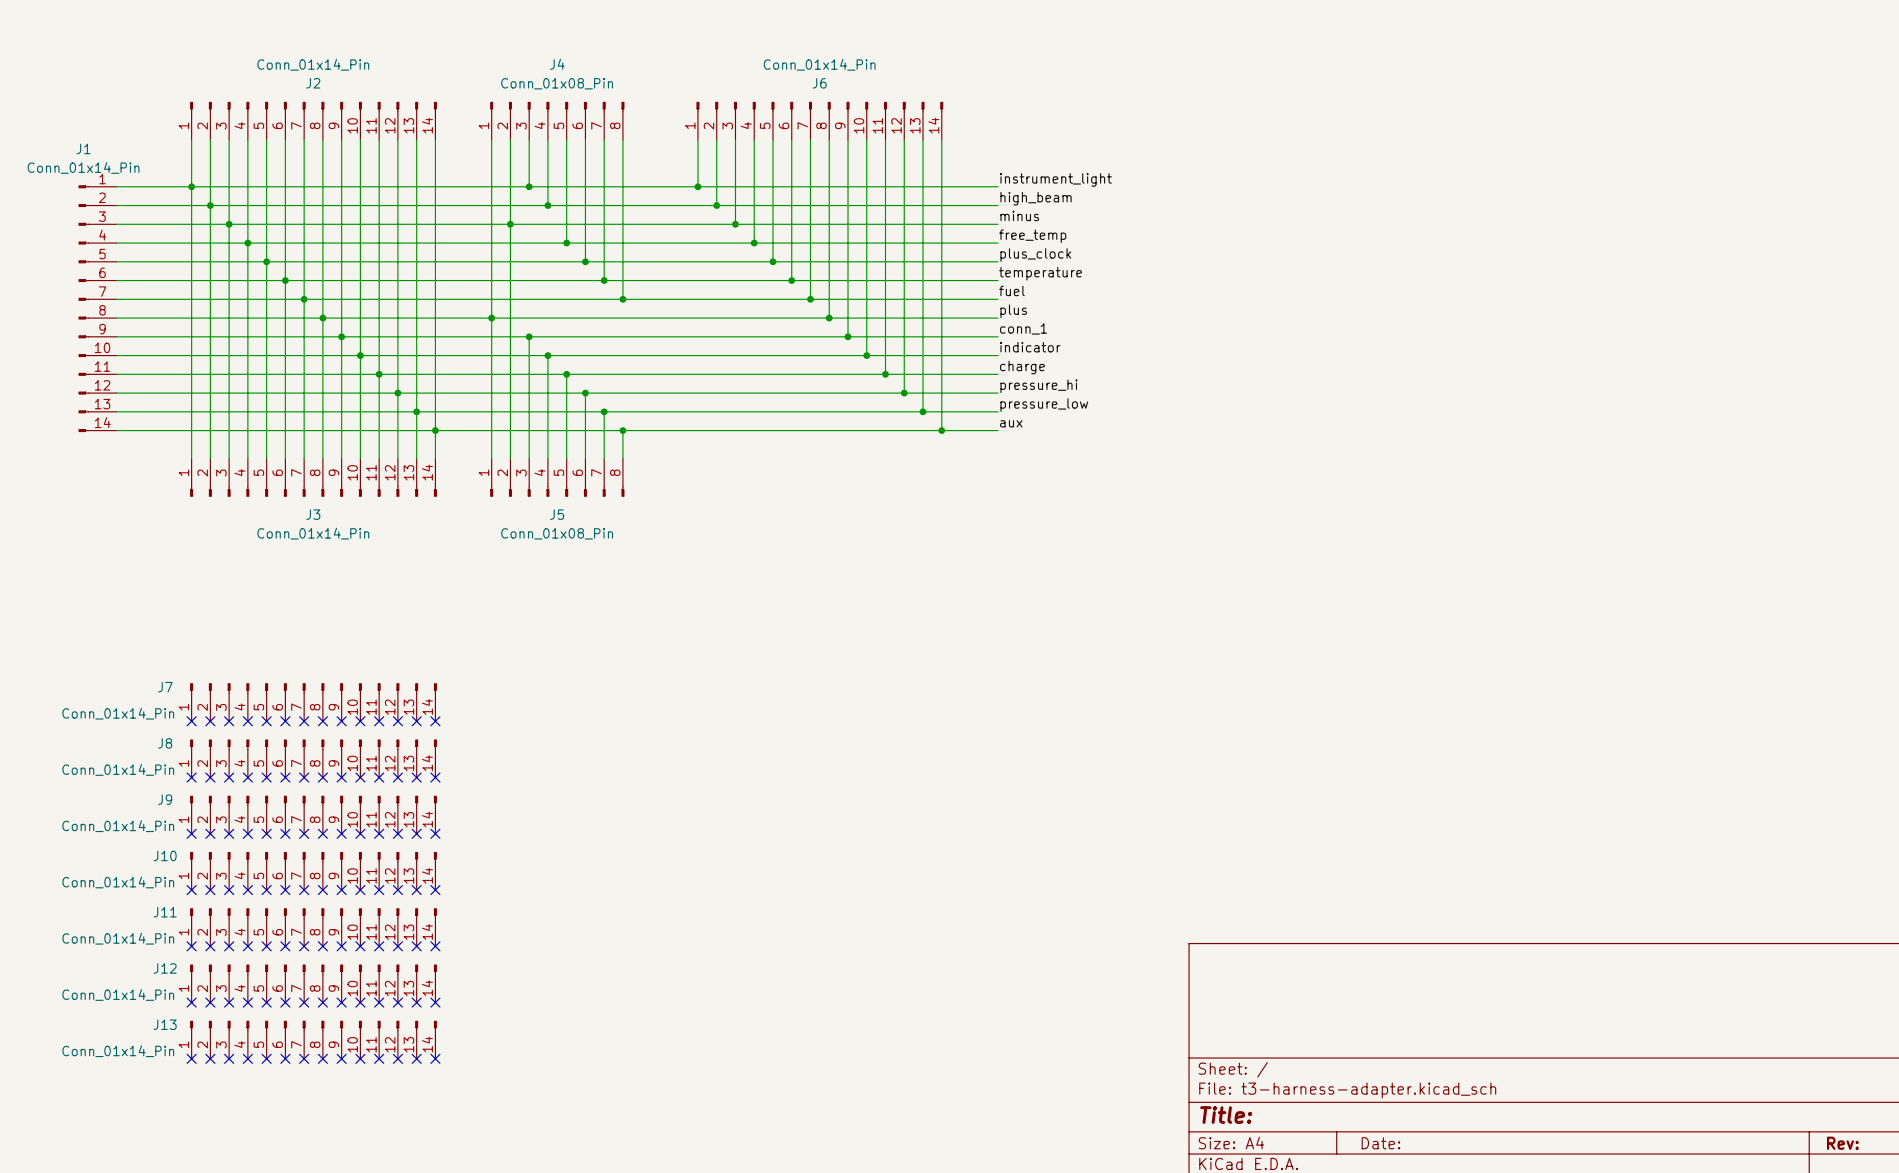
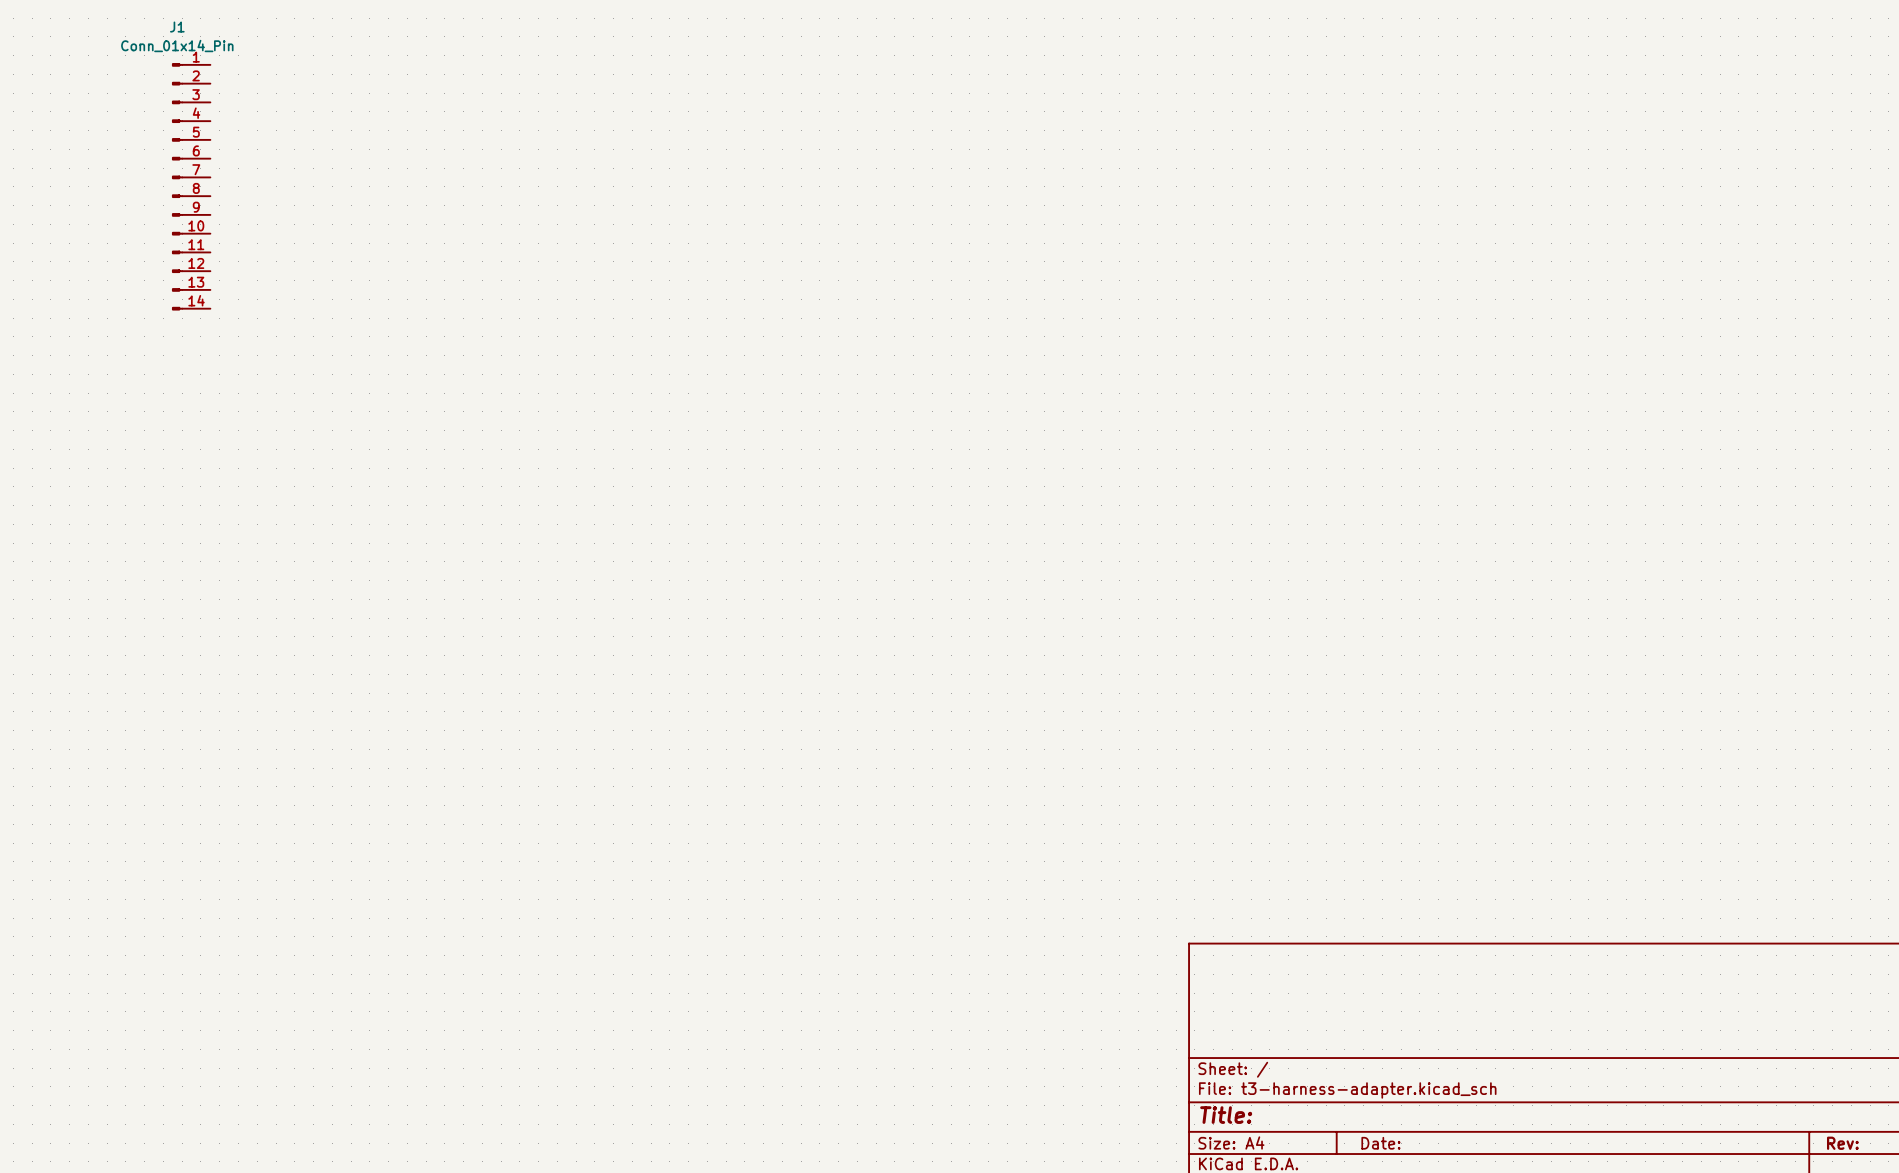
J2: Conn_01x14_Pin (313, 120) -> none
J4: Conn_01x08_Pin (557, 120) -> none
J6: Conn_01x14_Pin (819, 120) -> none
wire: (191, 139) (191, 458) -> none
wire: (210, 139) (210, 458) -> none
wire: (229, 139) (229, 458) -> none
wire: (247, 139) (247, 458) -> none
wire: (266, 139) (266, 458) -> none
wire: (285, 139) (285, 458) -> none
wire: (304, 139) (304, 458) -> none
wire: (322, 139) (322, 458) -> none
wire: (341, 139) (341, 458) -> none
wire: (360, 139) (360, 458) -> none
wire: (379, 139) (379, 458) -> none
wire: (397, 139) (397, 458) -> none
wire: (416, 139) (416, 458) -> none
wire: (435, 139) (435, 458) -> none
wire: (491, 139) (491, 458) -> none
wire: (510, 139) (510, 458) -> none
wire: (529, 139) (529, 186) -> none
wire: (547, 139) (547, 205) -> none
wire: (566, 139) (566, 243) -> none
wire: (585, 139) (585, 261) -> none
wire: (604, 139) (604, 280) -> none
wire: (622, 139) (622, 299) -> none
wire: (697, 139) (697, 186) -> none
wire: (716, 139) (716, 205) -> none
wire: (735, 139) (735, 224) -> none
wire: (754, 139) (754, 243) -> none
wire: (772, 139) (772, 261) -> none
wire: (791, 139) (791, 280) -> none
wire: (810, 139) (810, 299) -> none
wire: (829, 139) (829, 318) -> none
wire: (848, 139) (848, 336) -> none
wire: (866, 139) (866, 355) -> none
wire: (885, 139) (885, 374) -> none
wire: (904, 139) (904, 393) -> none
wire: (923, 139) (923, 411) -> none
wire: (941, 139) (941, 430) -> none
label: instrument_light (1055, 179) -> none
wire: (116, 186) (998, 186) -> none
junction: (191, 186) -> none
junction: (529, 186) -> none
junction: (697, 186) -> none
label: high_beam (1036, 198) -> none
wire: (116, 205) (998, 205) -> none
junction: (210, 205) -> none
junction: (547, 205) -> none
junction: (716, 205) -> none
label: minus (1019, 215) -> none
wire: (116, 224) (998, 224) -> none
junction: (229, 224) -> none
junction: (510, 224) -> none
junction: (735, 224) -> none
label: free_temp (1032, 236) -> none
wire: (116, 243) (998, 243) -> none
junction: (247, 243) -> none
junction: (566, 243) -> none
junction: (754, 243) -> none
label: plus_clock (1035, 255) -> none
wire: (116, 261) (998, 261) -> none
junction: (266, 261) -> none
junction: (585, 261) -> none
junction: (772, 261) -> none
label: temperature (1040, 273) -> none
wire: (116, 280) (998, 280) -> none
junction: (285, 280) -> none
junction: (604, 280) -> none
junction: (791, 280) -> none
label: fuel (1011, 290) -> none
wire: (116, 299) (998, 299) -> none
junction: (304, 299) -> none
junction: (622, 299) -> none
junction: (810, 299) -> none
J1 position: (97, 308) -> (191, 186)
label: plus (1013, 311) -> none
wire: (116, 318) (998, 318) -> none
junction: (322, 318) -> none
junction: (491, 318) -> none
junction: (829, 318) -> none
label: conn_1 (1023, 328) -> none
wire: (116, 336) (998, 336) -> none
junction: (341, 336) -> none
wire: (529, 336) (529, 458) -> none
junction: (529, 336) -> none
junction: (848, 336) -> none
label: indicator (1030, 347) -> none
wire: (116, 355) (998, 355) -> none
junction: (360, 355) -> none
wire: (547, 355) (547, 458) -> none
junction: (547, 355) -> none
junction: (866, 355) -> none
label: charge (1022, 367) -> none
wire: (116, 374) (998, 374) -> none
junction: (379, 374) -> none
wire: (566, 374) (566, 458) -> none
junction: (566, 374) -> none
junction: (885, 374) -> none
label: pressure_hi (1038, 386) -> none
wire: (116, 393) (998, 393) -> none
junction: (397, 393) -> none
wire: (585, 393) (585, 458) -> none
junction: (585, 393) -> none
junction: (904, 393) -> none
label: pressure_low (1044, 405) -> none
wire: (116, 411) (998, 411) -> none
junction: (416, 411) -> none
wire: (604, 411) (604, 458) -> none
junction: (604, 411) -> none
junction: (923, 411) -> none
label: aux (1011, 423) -> none
wire: (116, 430) (998, 430) -> none
junction: (435, 430) -> none
wire: (622, 430) (622, 458) -> none
junction: (622, 430) -> none
junction: (941, 430) -> none
J3: Conn_01x14_Pin (313, 477) -> none
J5: Conn_01x08_Pin (557, 477) -> none
J7: Conn_01x14_Pin (313, 702) -> none
no-connect mark: (191, 721) -> none
no-connect mark: (210, 721) -> none
no-connect mark: (229, 721) -> none
no-connect mark: (247, 721) -> none
no-connect mark: (266, 721) -> none
no-connect mark: (285, 721) -> none
no-connect mark: (304, 721) -> none
no-connect mark: (322, 721) -> none
no-connect mark: (341, 721) -> none
no-connect mark: (360, 721) -> none
no-connect mark: (379, 721) -> none
no-connect mark: (397, 721) -> none
no-connect mark: (416, 721) -> none
no-connect mark: (435, 721) -> none
J8: Conn_01x14_Pin (313, 758) -> none
no-connect mark: (191, 777) -> none
no-connect mark: (210, 777) -> none
no-connect mark: (229, 777) -> none
no-connect mark: (247, 777) -> none
no-connect mark: (266, 777) -> none
no-connect mark: (285, 777) -> none
no-connect mark: (304, 777) -> none
no-connect mark: (322, 777) -> none
no-connect mark: (341, 777) -> none
no-connect mark: (360, 777) -> none
no-connect mark: (379, 777) -> none
no-connect mark: (397, 777) -> none
no-connect mark: (416, 777) -> none
no-connect mark: (435, 777) -> none
J9: Conn_01x14_Pin (313, 814) -> none
no-connect mark: (191, 833) -> none
no-connect mark: (210, 833) -> none
no-connect mark: (229, 833) -> none
no-connect mark: (247, 833) -> none
no-connect mark: (266, 833) -> none
no-connect mark: (285, 833) -> none
no-connect mark: (304, 833) -> none
no-connect mark: (322, 833) -> none
no-connect mark: (341, 833) -> none
no-connect mark: (360, 833) -> none
no-connect mark: (379, 833) -> none
no-connect mark: (397, 833) -> none
no-connect mark: (416, 833) -> none
no-connect mark: (435, 833) -> none
J10: Conn_01x14_Pin (313, 871) -> none
no-connect mark: (191, 890) -> none
no-connect mark: (210, 890) -> none
no-connect mark: (229, 890) -> none
no-connect mark: (247, 890) -> none
no-connect mark: (266, 890) -> none
no-connect mark: (285, 890) -> none
no-connect mark: (304, 890) -> none
no-connect mark: (322, 890) -> none
no-connect mark: (341, 890) -> none
no-connect mark: (360, 890) -> none
no-connect mark: (379, 890) -> none
no-connect mark: (397, 890) -> none
no-connect mark: (416, 890) -> none
no-connect mark: (435, 890) -> none
J11: Conn_01x14_Pin (313, 927) -> none
no-connect mark: (191, 946) -> none
no-connect mark: (210, 946) -> none
no-connect mark: (229, 946) -> none
no-connect mark: (247, 946) -> none
no-connect mark: (266, 946) -> none
no-connect mark: (285, 946) -> none
no-connect mark: (304, 946) -> none
no-connect mark: (322, 946) -> none
no-connect mark: (341, 946) -> none
no-connect mark: (360, 946) -> none
no-connect mark: (379, 946) -> none
no-connect mark: (397, 946) -> none
no-connect mark: (416, 946) -> none
no-connect mark: (435, 946) -> none
J12: Conn_01x14_Pin (313, 983) -> none
no-connect mark: (191, 1002) -> none
no-connect mark: (210, 1002) -> none
no-connect mark: (229, 1002) -> none
no-connect mark: (247, 1002) -> none
no-connect mark: (266, 1002) -> none
no-connect mark: (285, 1002) -> none
no-connect mark: (304, 1002) -> none
no-connect mark: (322, 1002) -> none
no-connect mark: (341, 1002) -> none
no-connect mark: (360, 1002) -> none
no-connect mark: (379, 1002) -> none
no-connect mark: (397, 1002) -> none
no-connect mark: (416, 1002) -> none
no-connect mark: (435, 1002) -> none
J13: Conn_01x14_Pin (313, 1039) -> none
no-connect mark: (191, 1058) -> none
no-connect mark: (210, 1058) -> none
no-connect mark: (229, 1058) -> none
no-connect mark: (247, 1058) -> none
no-connect mark: (266, 1058) -> none
no-connect mark: (285, 1058) -> none
no-connect mark: (304, 1058) -> none
no-connect mark: (322, 1058) -> none
no-connect mark: (341, 1058) -> none
no-connect mark: (360, 1058) -> none
no-connect mark: (379, 1058) -> none
no-connect mark: (397, 1058) -> none
no-connect mark: (416, 1058) -> none
no-connect mark: (435, 1058) -> none

